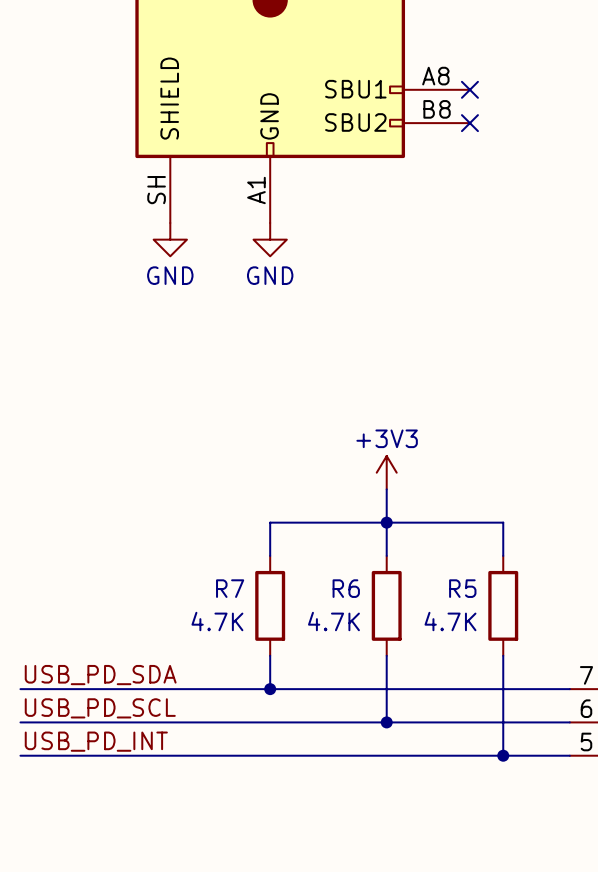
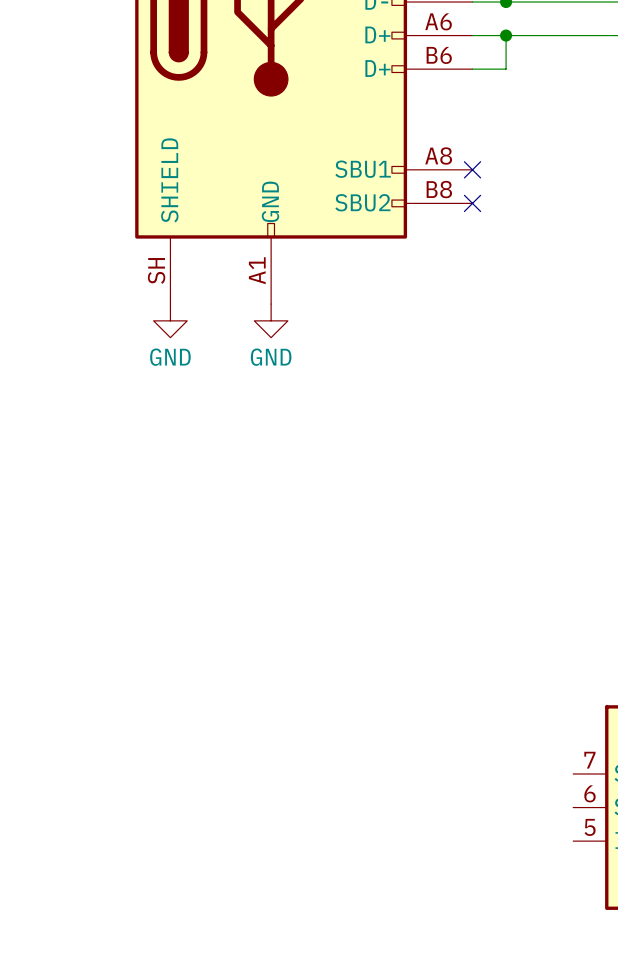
power symbol: +3V3 (386, 472) -> none
wire: (386, 489) (386, 555) -> none
junction: (386, 522) -> none
wire: (270, 555) (270, 522) (503, 522) (503, 555) -> none
R7: 4.7K (270, 605) -> none
R6: 4.7K (386, 605) -> none
R5: 4.7K (503, 605) -> none
wire: (270, 655) (270, 689) -> none
wire: (386, 655) (386, 722) -> none
wire: (503, 655) (503, 755) -> none
label: USB_PD_SDA (100, 675) -> none
wire: (20, 689) (569, 689) -> none
junction: (270, 689) -> none
label: USB_PD_SCL (100, 708) -> none
wire: (20, 722) (569, 722) -> none
junction: (386, 722) -> none
label: USB_PD_INT (96, 741) -> none
wire: (20, 755) (569, 755) -> none
junction: (503, 755) -> none

